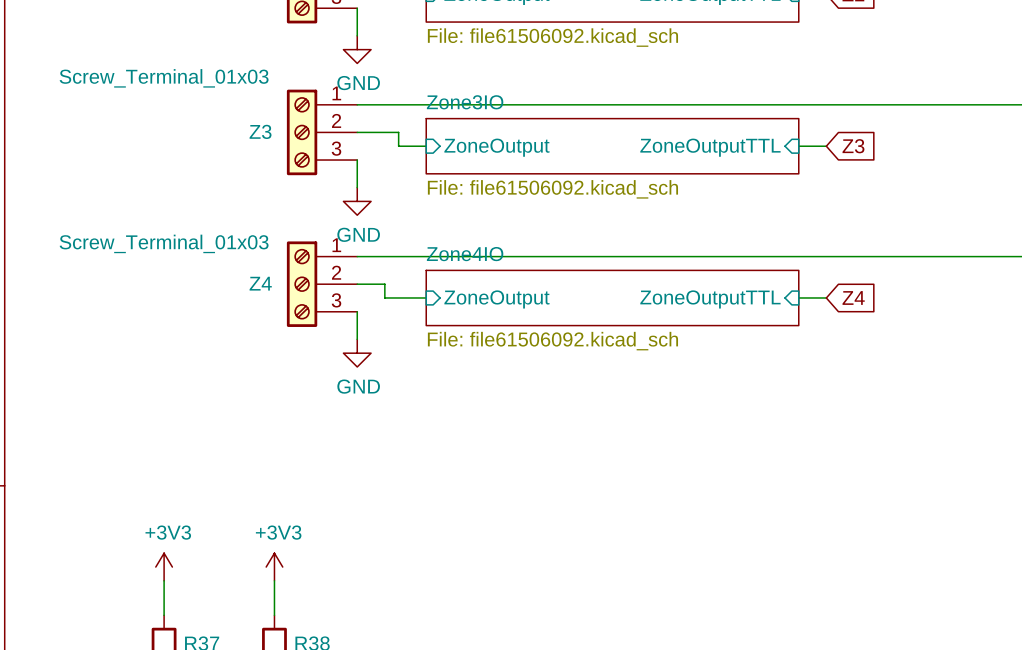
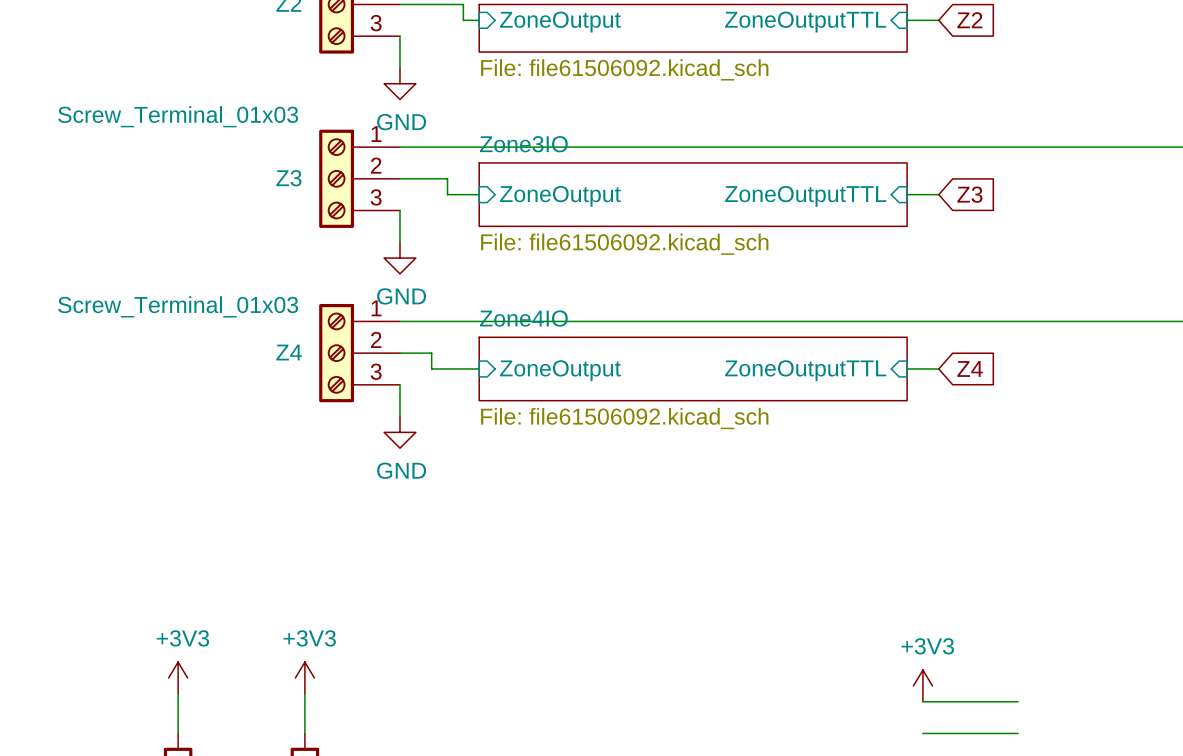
power symbol: none -> +3V3 (922, 685)
wire: none -> (922, 701) (1018, 701)
wire: none -> (922, 733) (1018, 733)

